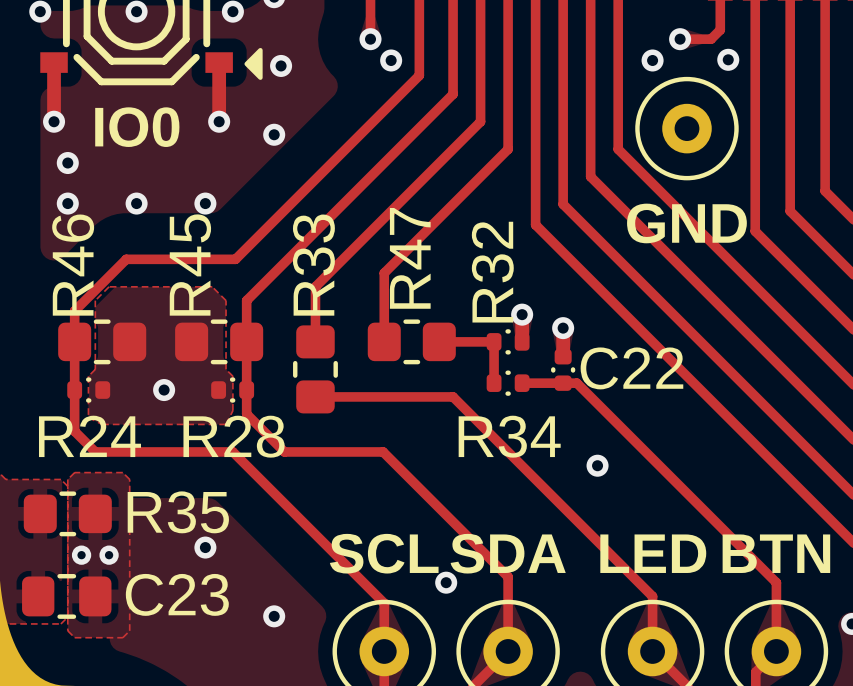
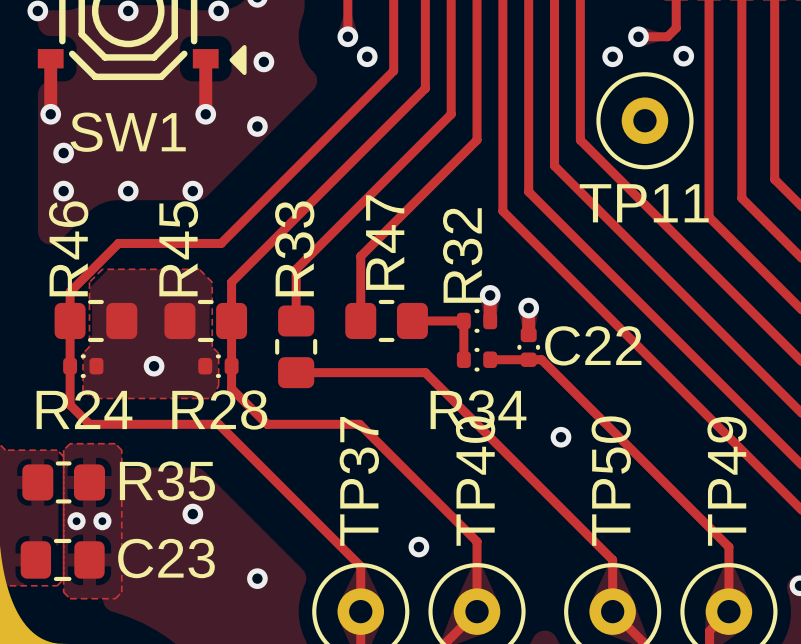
text: IO0 (137, 127) -> none
SW1 name: none -> SW1 (128, 132)
TP11 name: none -> TP11 (644, 203)
text: GND (686, 223) -> none
TP37 name: none -> TP37 (359, 481)
TP40 name: none -> TP40 (475, 481)
TP50 name: none -> TP50 (611, 481)
TP49 name: none -> TP49 (727, 481)
text: SCL (384, 553) -> none
text: SDA (508, 553) -> none
text: LED (653, 553) -> none
text: BTN (776, 553) -> none

